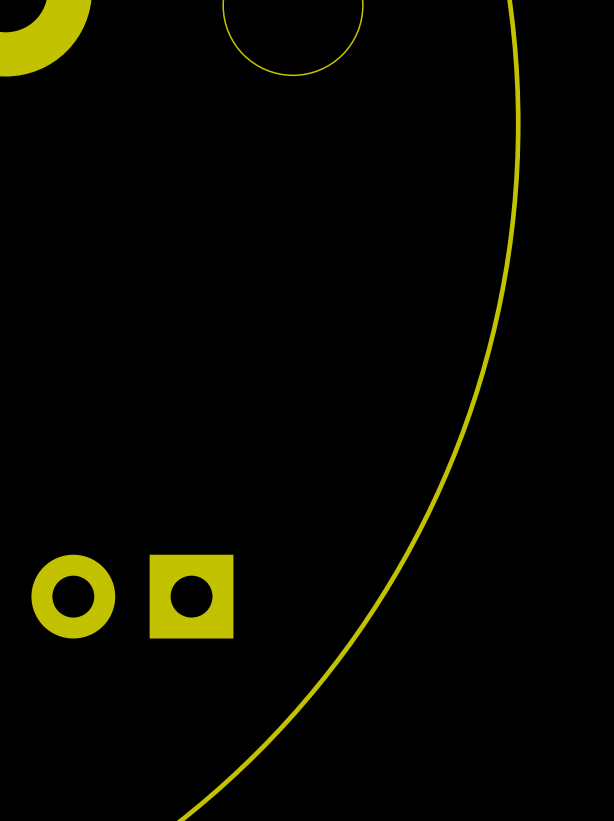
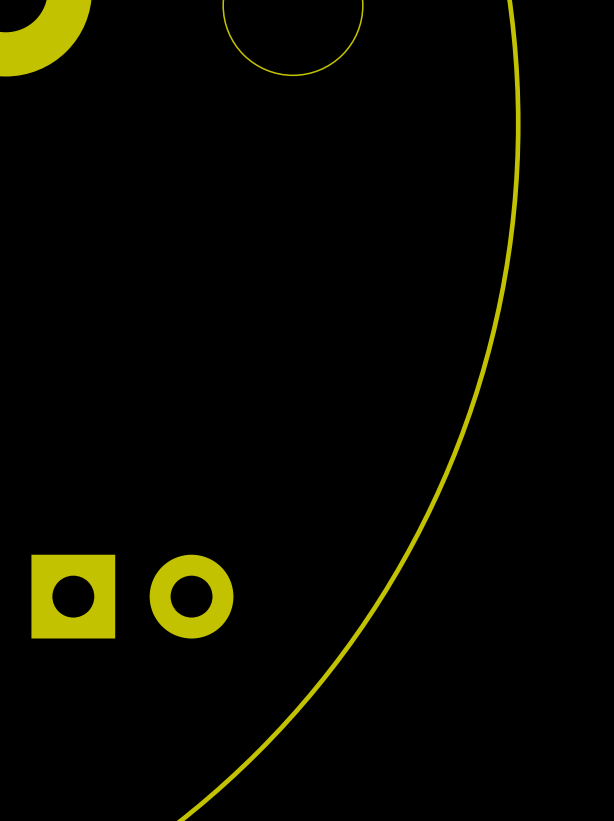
part rotation: 0° (132, 596) -> 180° (132, 596)

